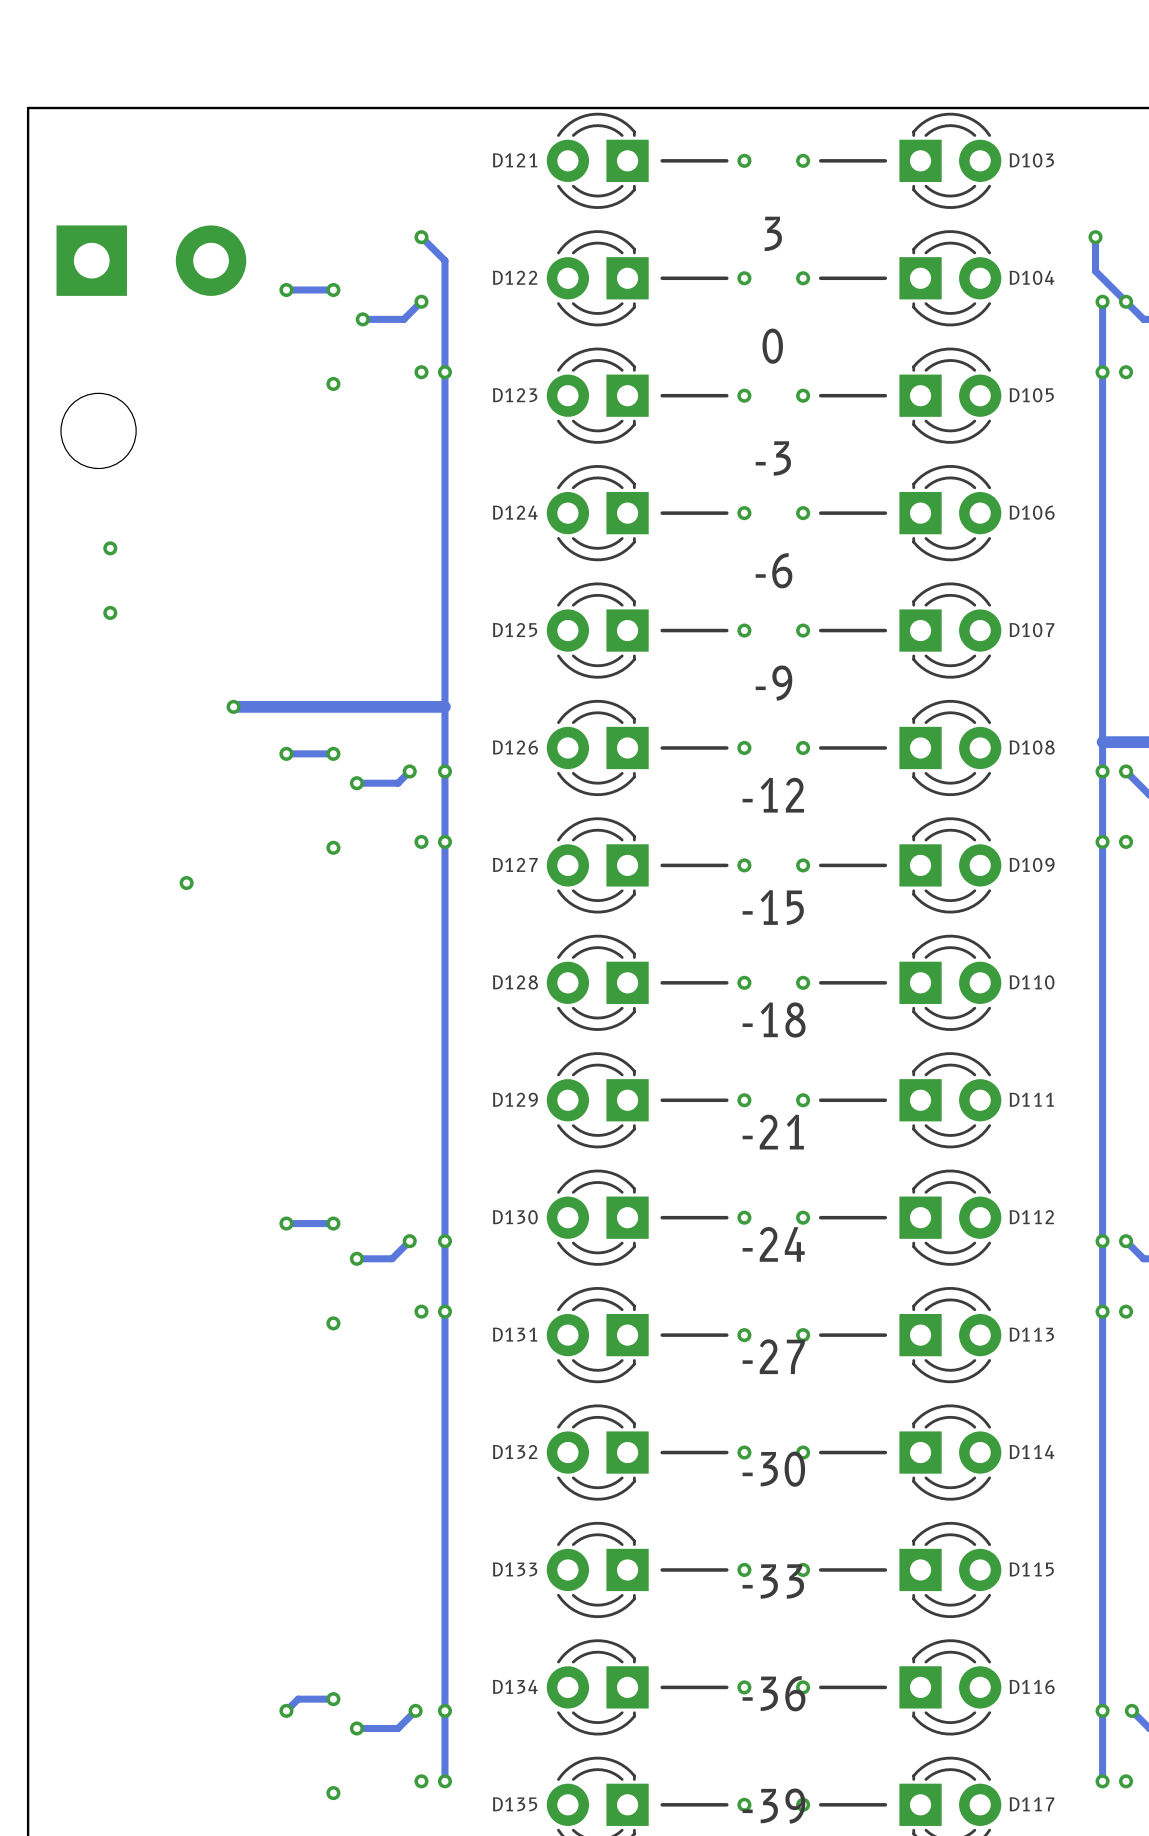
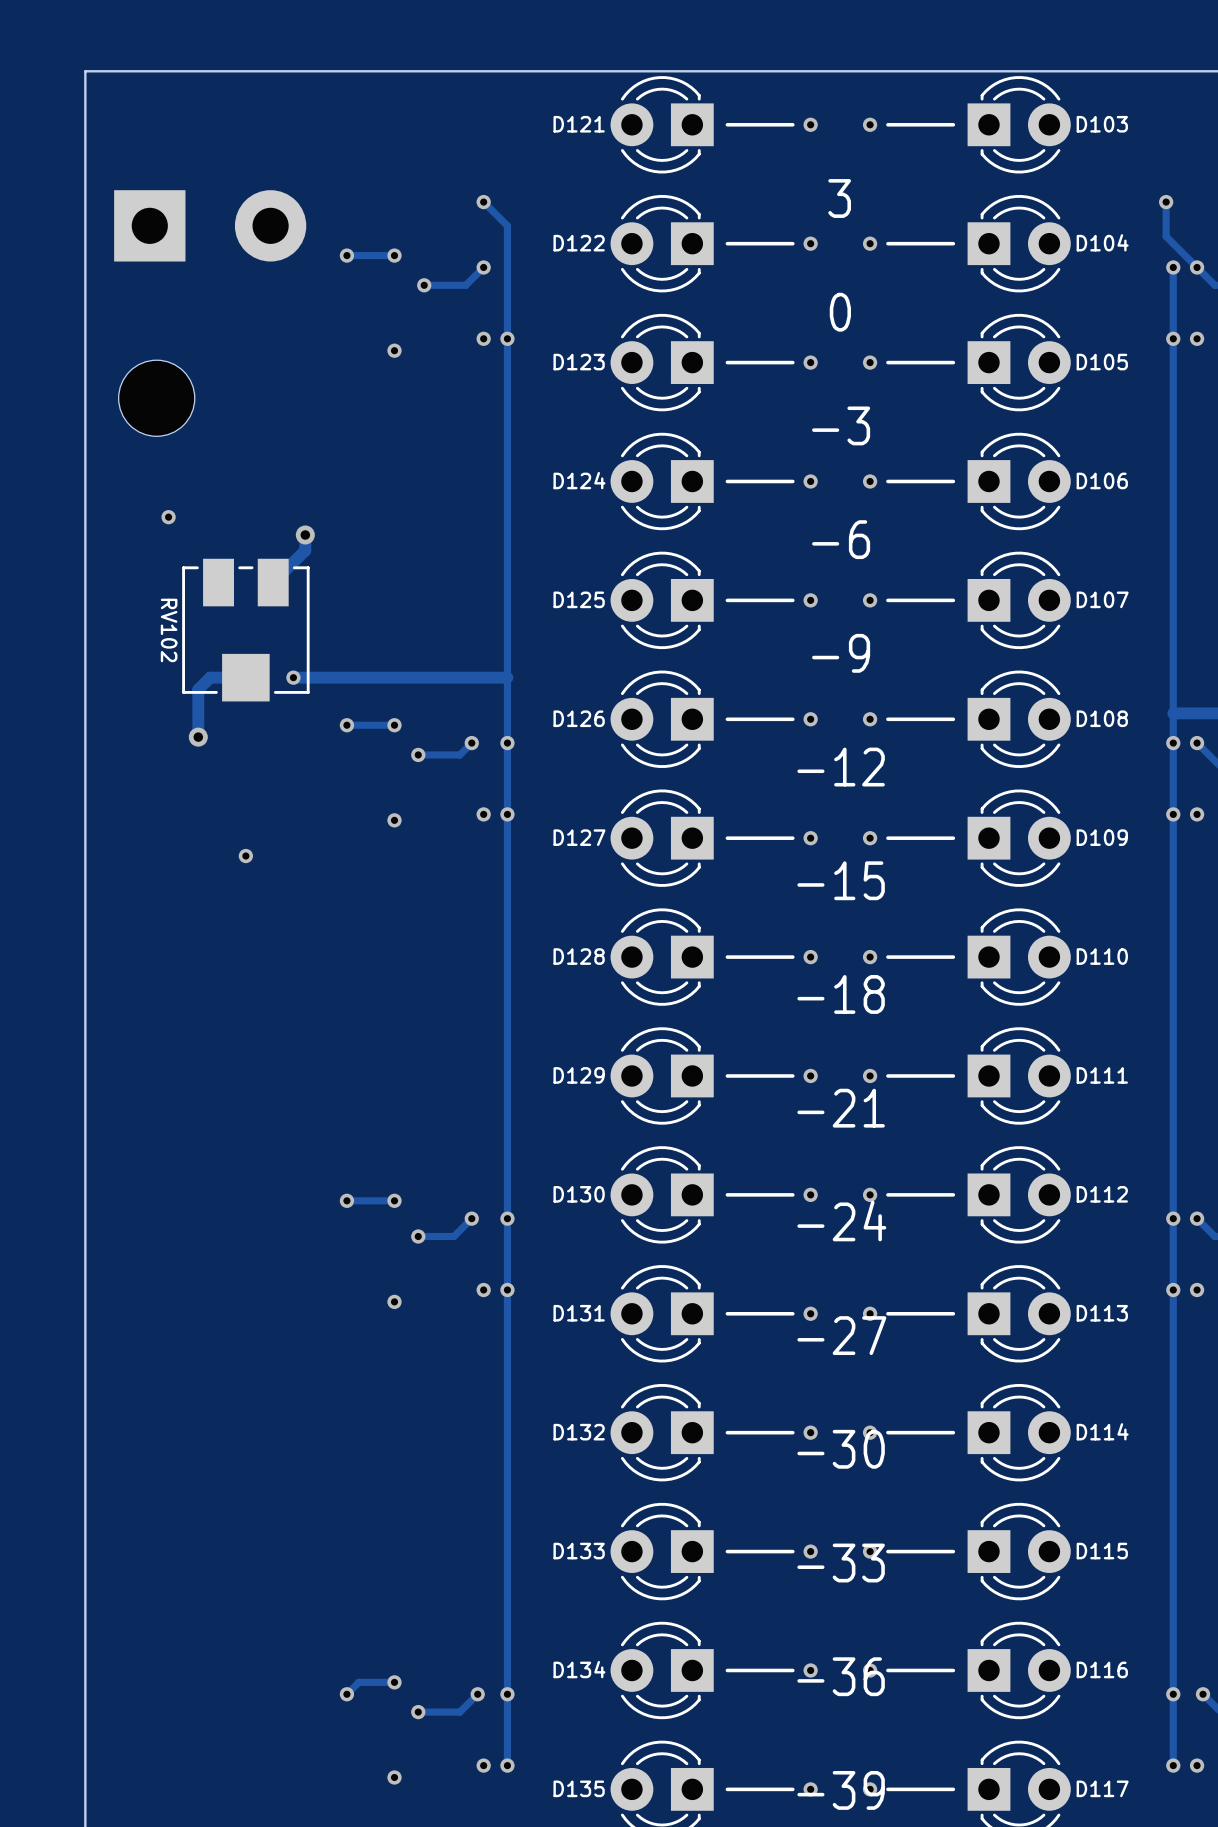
track: none -> (305, 534) (305, 550) (273, 582)
via: none -> (305, 534)
via: (110, 612) -> none
RV102: none -> (245, 630)
track: none -> (245, 677) (210, 677) (198, 689) (198, 737)
via: none -> (198, 737)

